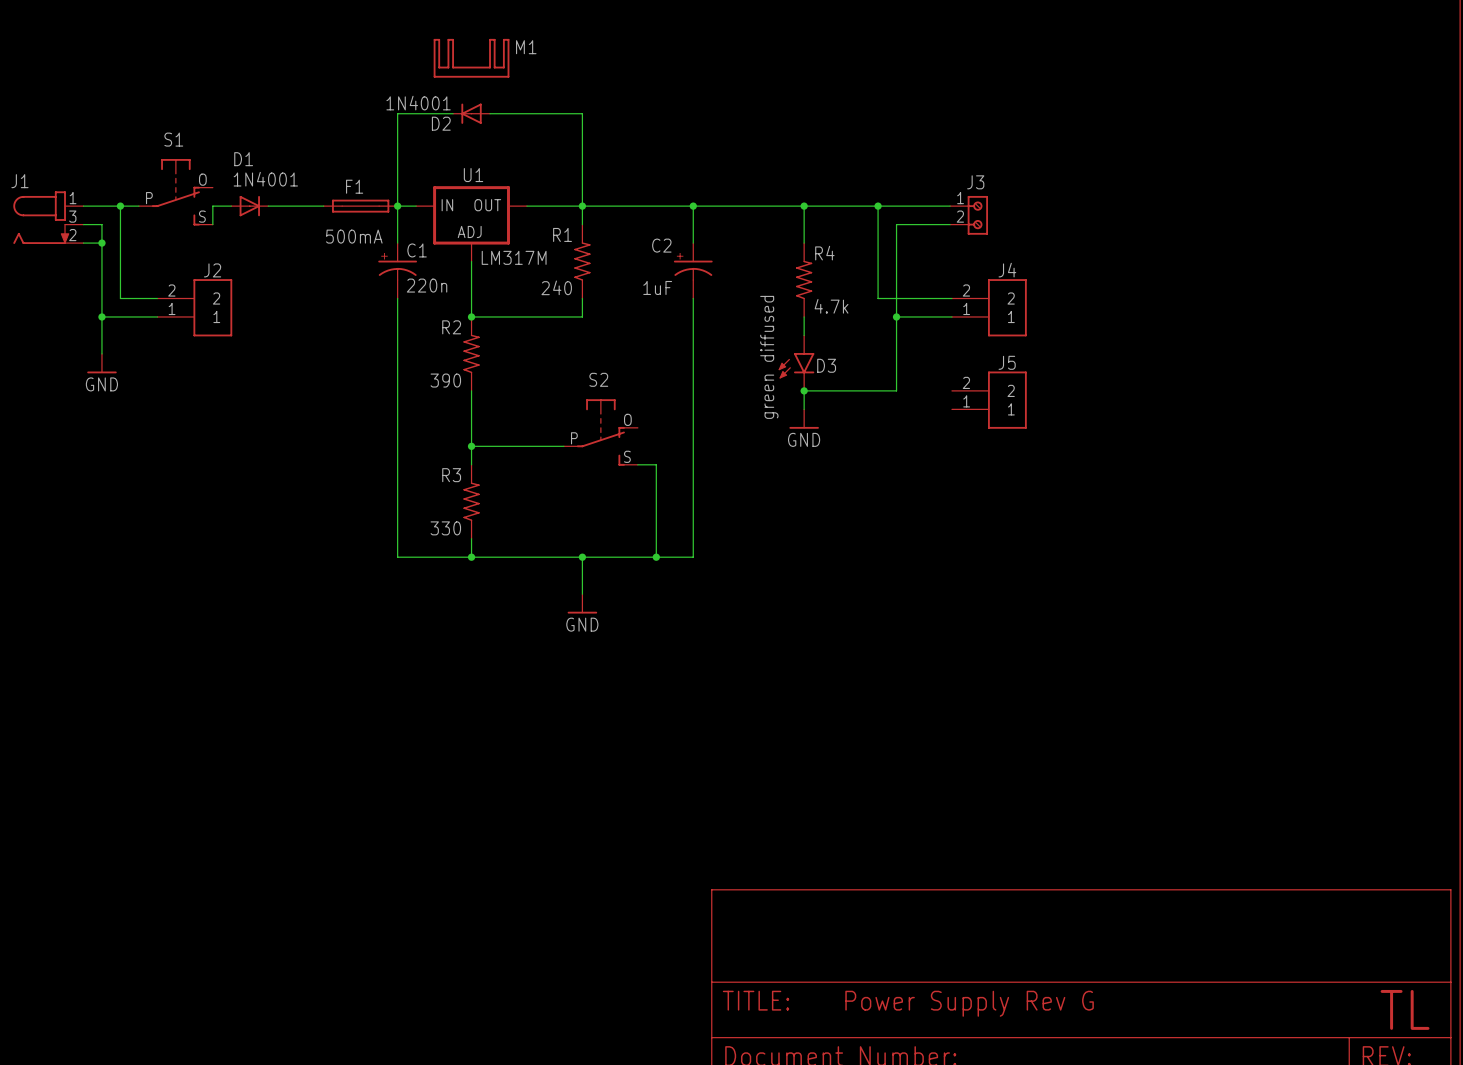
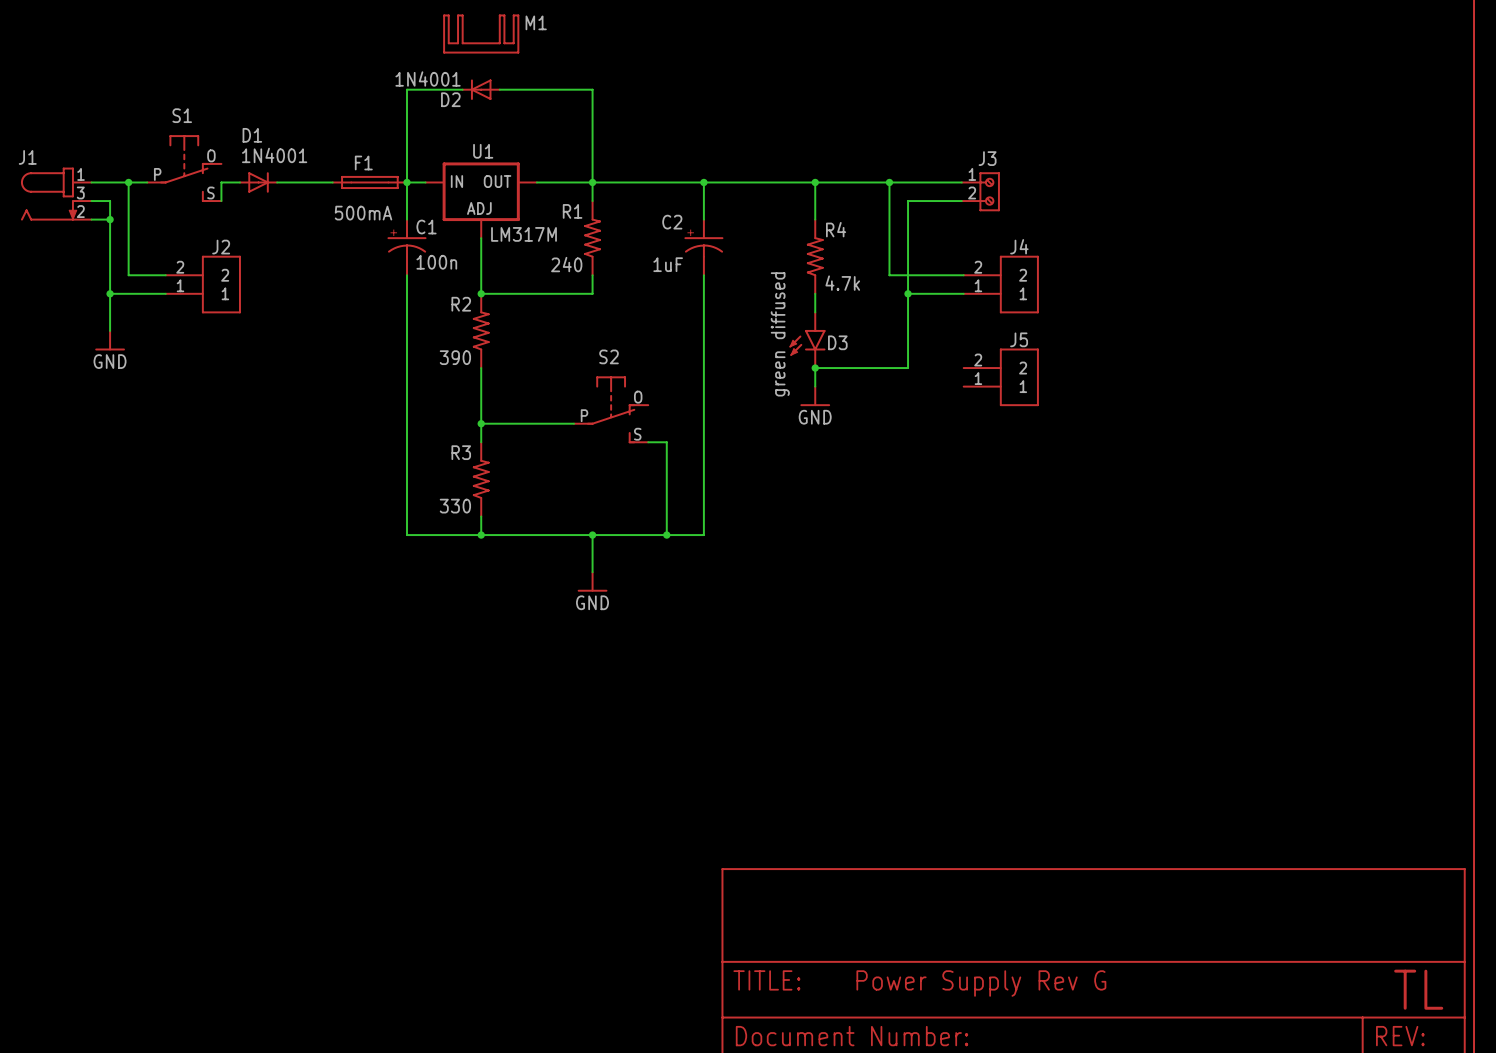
C1 value: 220n (427, 285) -> 100n (436, 262)

